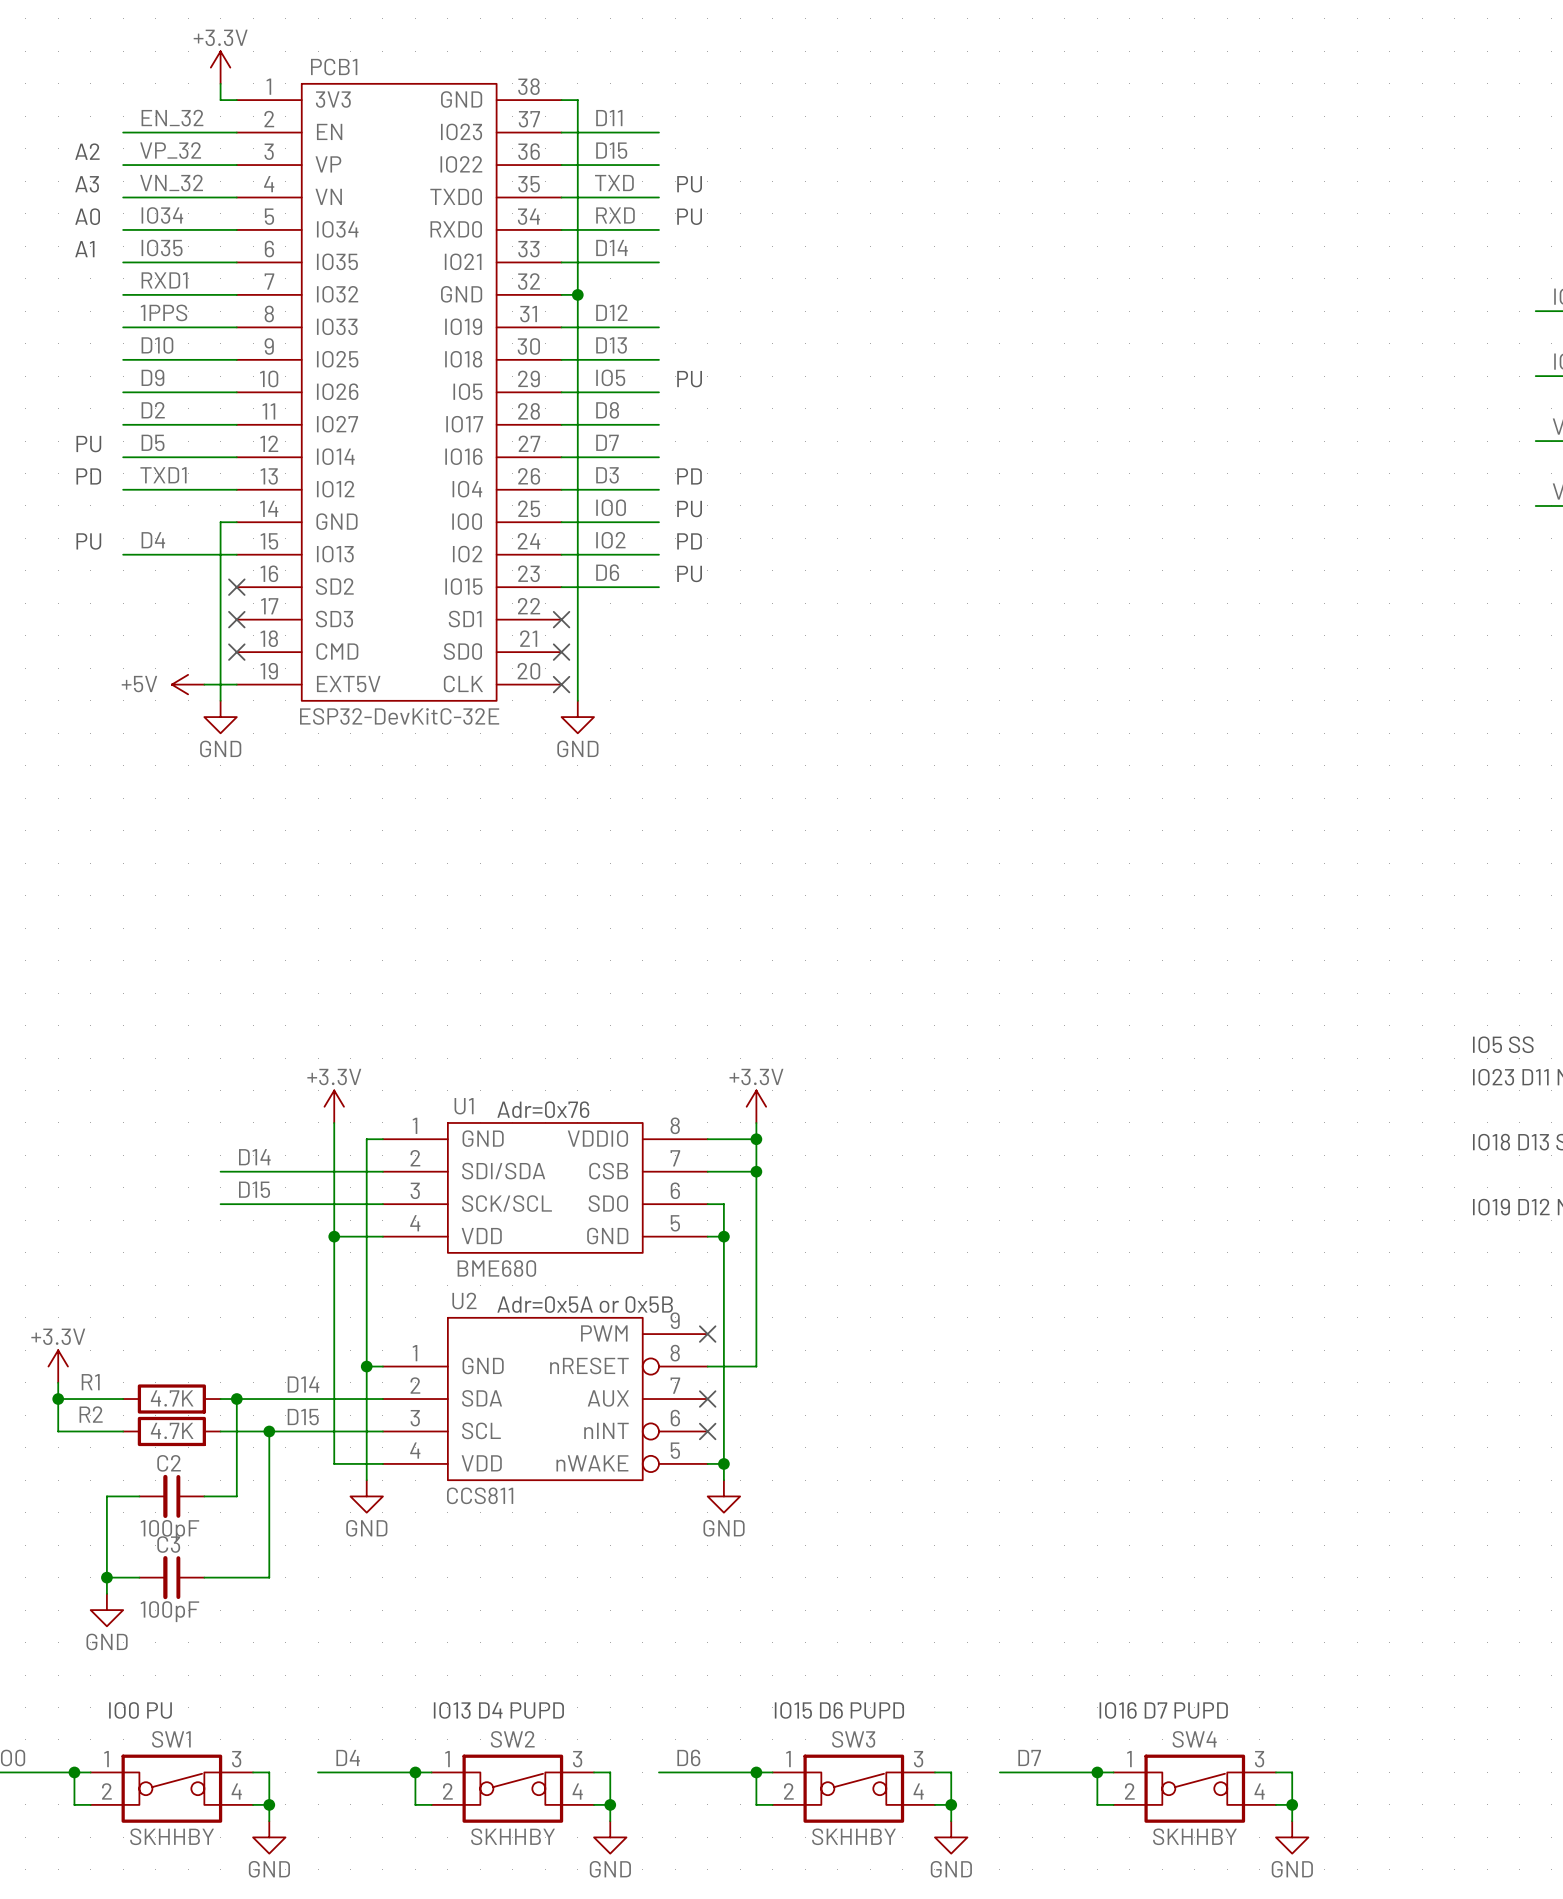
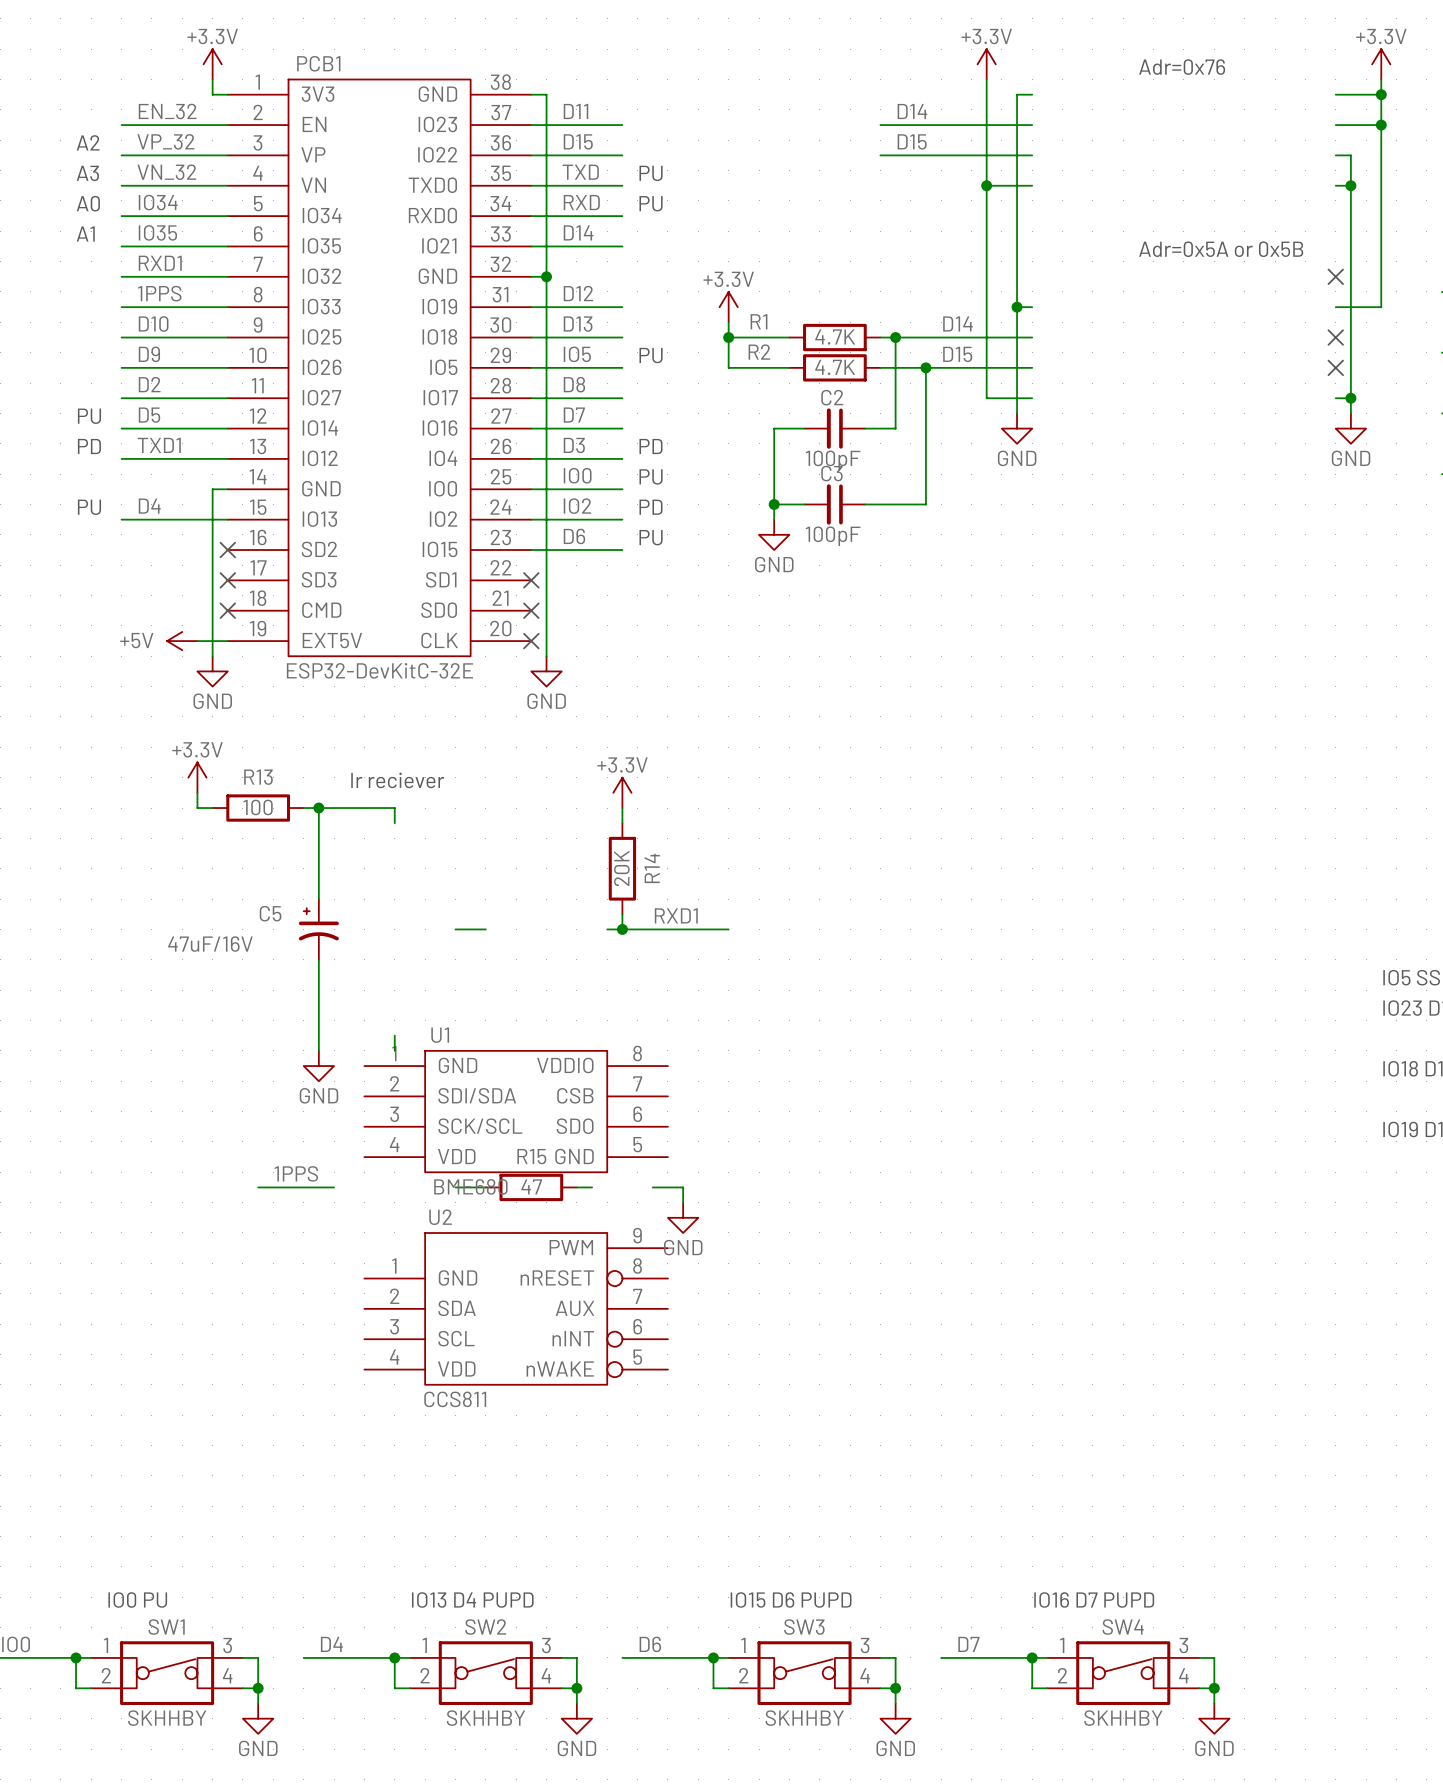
power symbol: none -> +3.3V (986, 64)
power symbol: none -> +3.3V (1381, 64)
text: none -> Adr=0x76 (1182, 67)
wire: none -> (986, 79) (986, 398) (1032, 398)
wire: none -> (1381, 79) (1381, 307) (1335, 307)
wire: none -> (1032, 94) (1017, 94) (1017, 413)
wire: none -> (1335, 94) (1381, 94)
junction: none -> (1381, 94)
label: none -> D14 (912, 111)
wire: none -> (880, 125) (1032, 125)
wire: none -> (1335, 125) (1381, 125)
junction: none -> (1381, 125)
label: none -> D15 (912, 141)
wire: none -> (880, 155) (1032, 155)
wire: none -> (1335, 155) (1350, 155) (1350, 413)
wire: none -> (986, 185) (1032, 185)
junction: none -> (986, 185)
wire: none -> (1335, 185) (1350, 185)
junction: none -> (1350, 185)
text: none -> Adr=0x5A or 0x5B (1221, 249)
no-connect mark: none -> (1335, 276)
power symbol: none -> +3.3V (728, 307)
wire: none -> (1017, 307) (1032, 307)
junction: none -> (1017, 307)
wire: none -> (728, 322) (728, 367) (789, 367)
label: none -> D14 (957, 323)
wire: none -> (728, 337) (789, 337)
junction: none -> (728, 337)
wire: none -> (880, 337) (1032, 337)
wire: none -> (895, 337) (895, 428) (865, 428)
junction: none -> (895, 337)
no-connect mark: none -> (1335, 337)
label: none -> D15 (957, 354)
wire: none -> (880, 367) (1032, 367)
wire: none -> (925, 367) (925, 504) (865, 504)
junction: none -> (925, 367)
no-connect mark: none -> (1335, 367)
wire: none -> (1335, 398) (1350, 398)
junction: none -> (1350, 398)
wire: none -> (804, 428) (774, 428) (774, 519)
power symbol: none -> GND (1017, 428)
power symbol: none -> GND (1350, 428)
wire: none -> (774, 504) (804, 504)
junction: none -> (774, 504)
power symbol: none -> GND (774, 534)
power symbol: none -> +3.3V (197, 777)
text: none -> Ir reciever (397, 780)
wire: none -> (197, 792) (197, 808) (212, 808)
power symbol: none -> +3.3V (622, 792)
R13: none -> 100 (258, 808)
wire: none -> (303, 808) (394, 808) (394, 823)
wire: none -> (318, 808) (318, 899)
junction: none -> (318, 808)
wire: none -> (622, 808) (622, 823)
R14: none -> 20K (622, 868)
wire: none -> (622, 914) (622, 929)
label: none -> RXD1 (676, 915)
C5: none -> 47uF/16V (318, 929)
wire: none -> (455, 929) (485, 929)
wire: none -> (607, 929) (728, 929)
junction: none -> (622, 929)
power symbol: +3.3V (334, 1106) -> none
wire: none -> (394, 1035) (394, 1050)
power symbol: +3.3V (756, 1106) -> none
text: Adr=0x76 (543, 1109) -> none
wire: (334, 1122) (334, 1463) (382, 1463) -> (318, 1050) (318, 959)
wire: (756, 1122) (756, 1366) (707, 1366) -> none
power symbol: none -> GND (318, 1066)
wire: (382, 1139) (366, 1139) (366, 1480) -> none
wire: (707, 1139) (756, 1139) -> none
junction: (756, 1139) -> none
label: D14 (254, 1157) -> none
wire: (220, 1171) (382, 1171) -> none
wire: (707, 1171) (756, 1171) -> none
junction: (756, 1171) -> none
label: D15 (254, 1189) -> none
wire: (220, 1204) (382, 1204) -> none
wire: (707, 1204) (723, 1204) (723, 1269) -> (652, 1187) (683, 1187)
wire: (334, 1236) (382, 1236) -> none
junction: (334, 1236) -> none
wire: (707, 1236) (723, 1236) -> (576, 1187) (592, 1187)
junction: (723, 1236) -> none
label: none -> 1PPS (296, 1173)
wire: none -> (258, 1187) (334, 1187)
wire: none -> (455, 1187) (485, 1187)
R15: none -> 47 (531, 1187)
wire: (723, 1285) (723, 1480) -> none
text: Adr=0x5A or 0x5B (585, 1304) -> none
no-connect mark: (707, 1334) -> none
power symbol: +3.3V (58, 1366) -> none
wire: (366, 1366) (382, 1366) -> none
junction: (366, 1366) -> none
wire: (58, 1382) (58, 1431) (123, 1431) -> none
label: D14 (303, 1384) -> none
wire: (58, 1399) (123, 1399) -> none
junction: (58, 1399) -> none
R1 position: (171, 1399) -> (834, 337)
wire: (220, 1399) (382, 1399) -> none
wire: (236, 1399) (236, 1496) (204, 1496) -> none
junction: (236, 1399) -> none
no-connect mark: (707, 1399) -> none
label: D15 (303, 1417) -> none
R2 position: (171, 1431) -> (834, 367)
wire: (220, 1431) (382, 1431) -> none
wire: (269, 1431) (269, 1577) (204, 1577) -> none
junction: (269, 1431) -> none
no-connect mark: (707, 1431) -> none
wire: (707, 1463) (723, 1463) -> none
junction: (723, 1463) -> none
wire: (139, 1496) (106, 1496) (106, 1593) -> none
C2 position: (171, 1496) -> (834, 428)
power symbol: GND (366, 1496) -> none
power symbol position: GND (723, 1496) -> GND (683, 1217)
wire: (106, 1577) (139, 1577) -> none
junction: (106, 1577) -> none
C3 position: (171, 1577) -> (834, 504)
power symbol: GND (106, 1610) -> none

